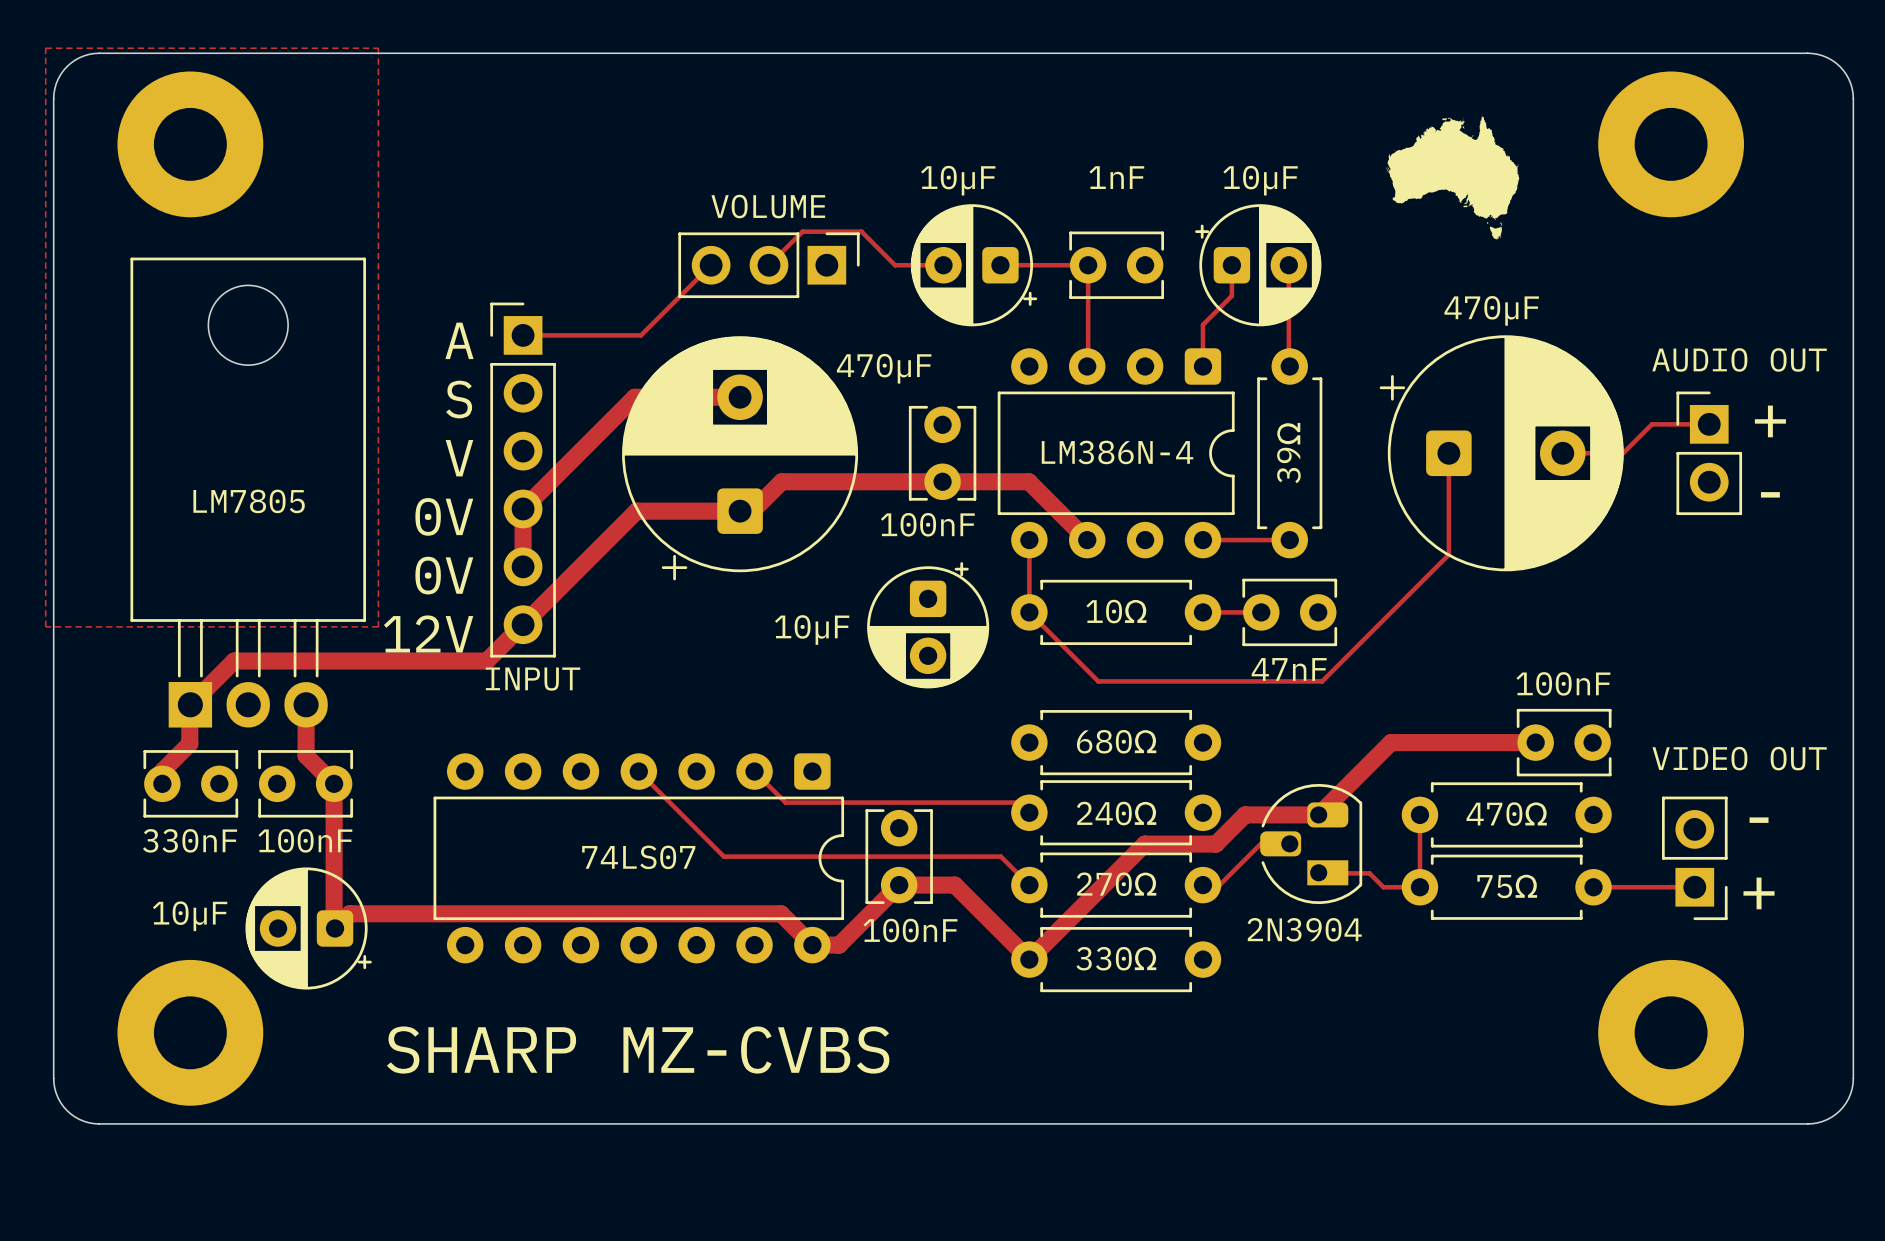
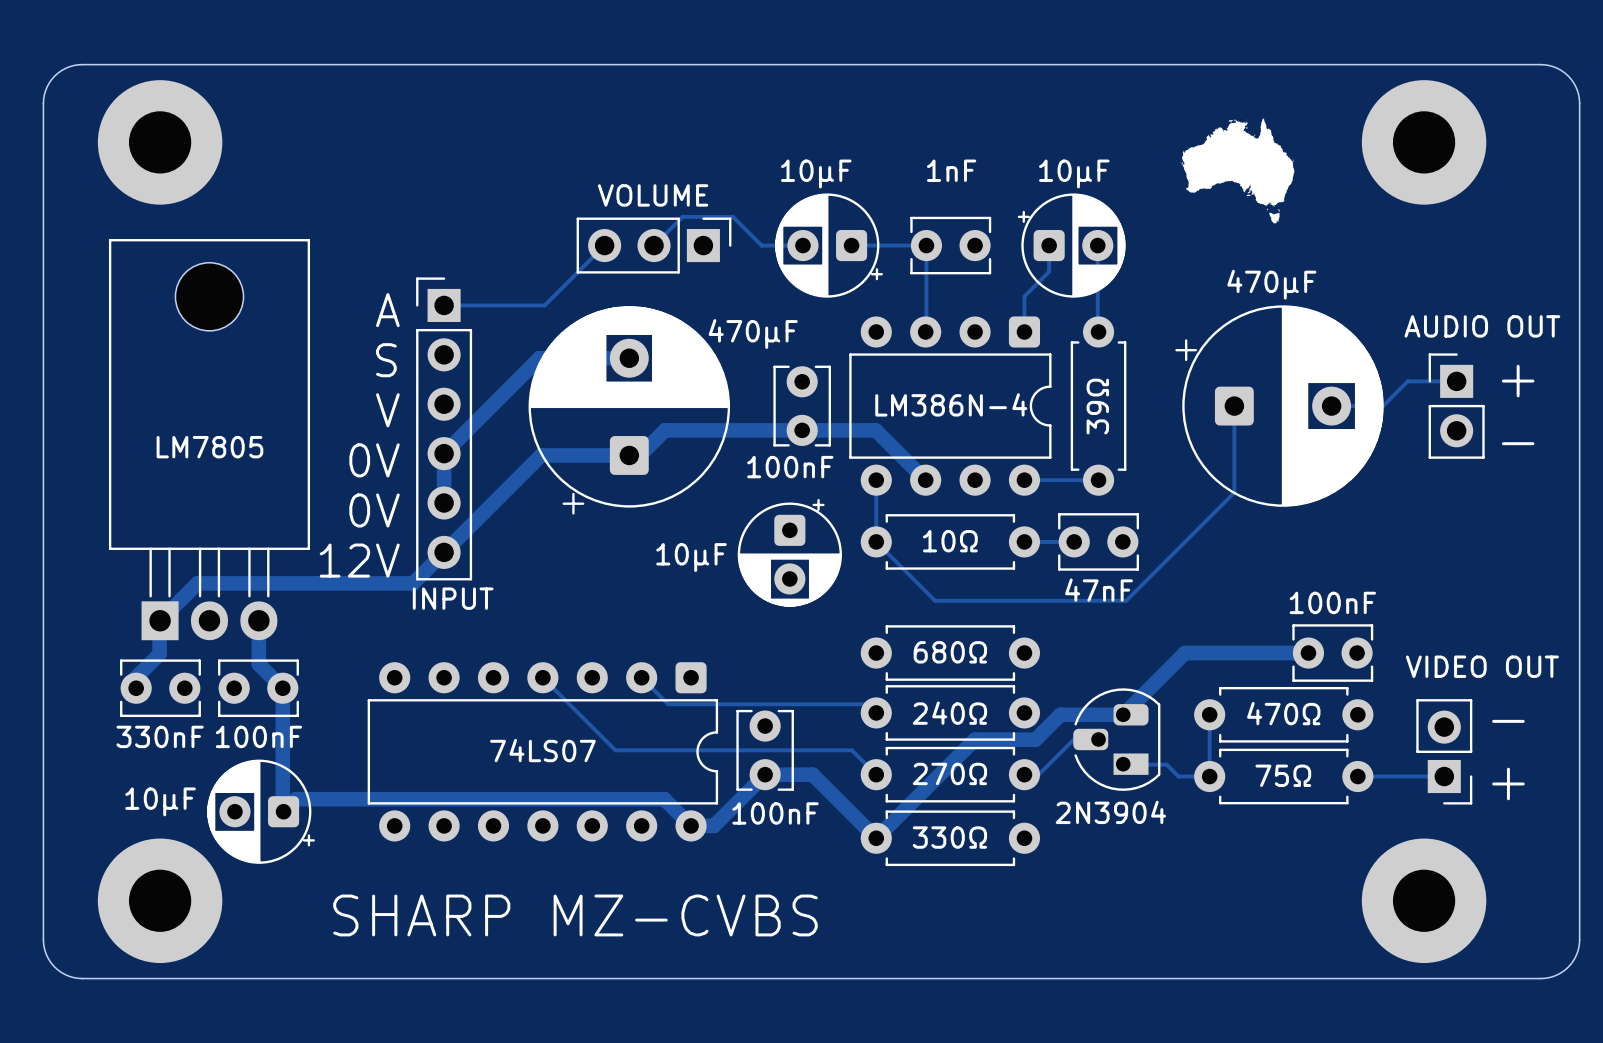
zone outline: (45, 48) (378, 48) (378, 626) (45, 626) (45, 48) -> none

